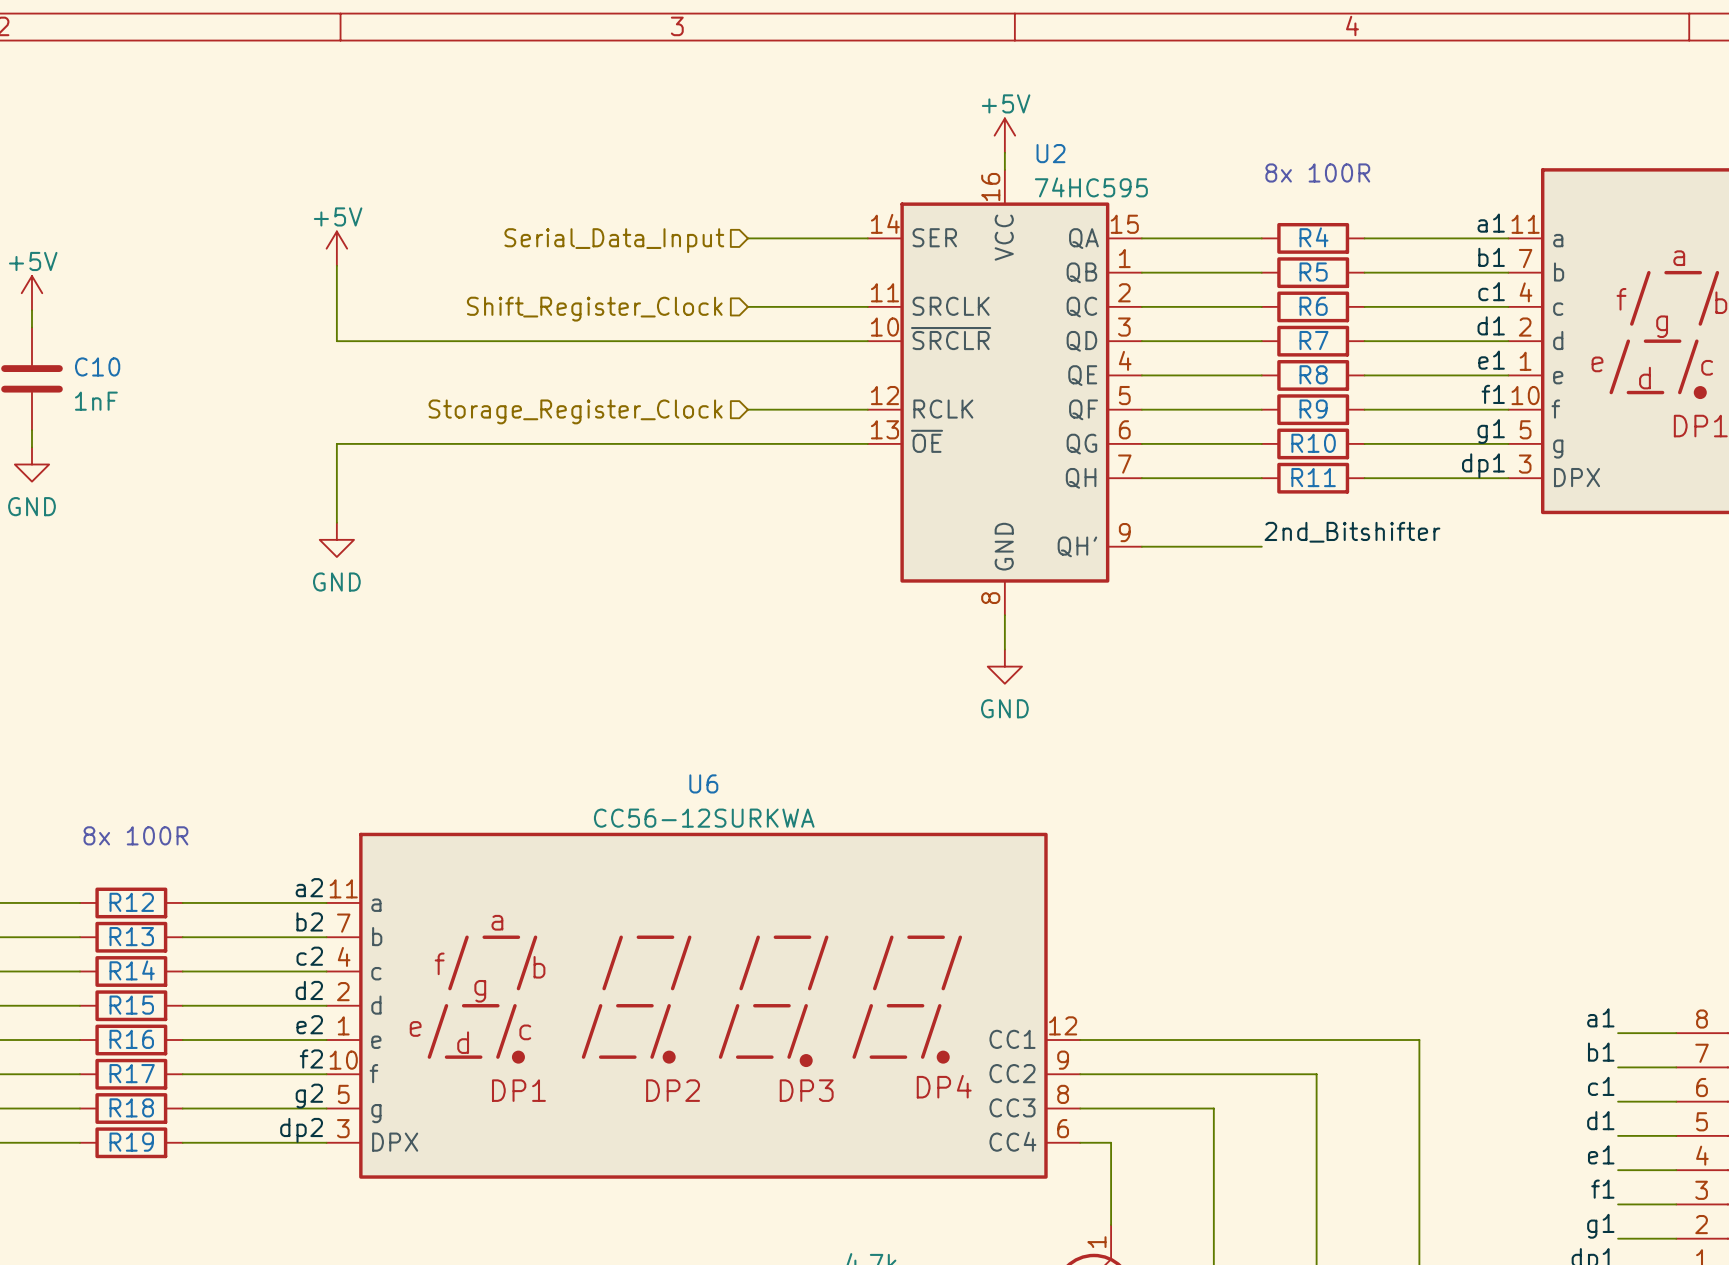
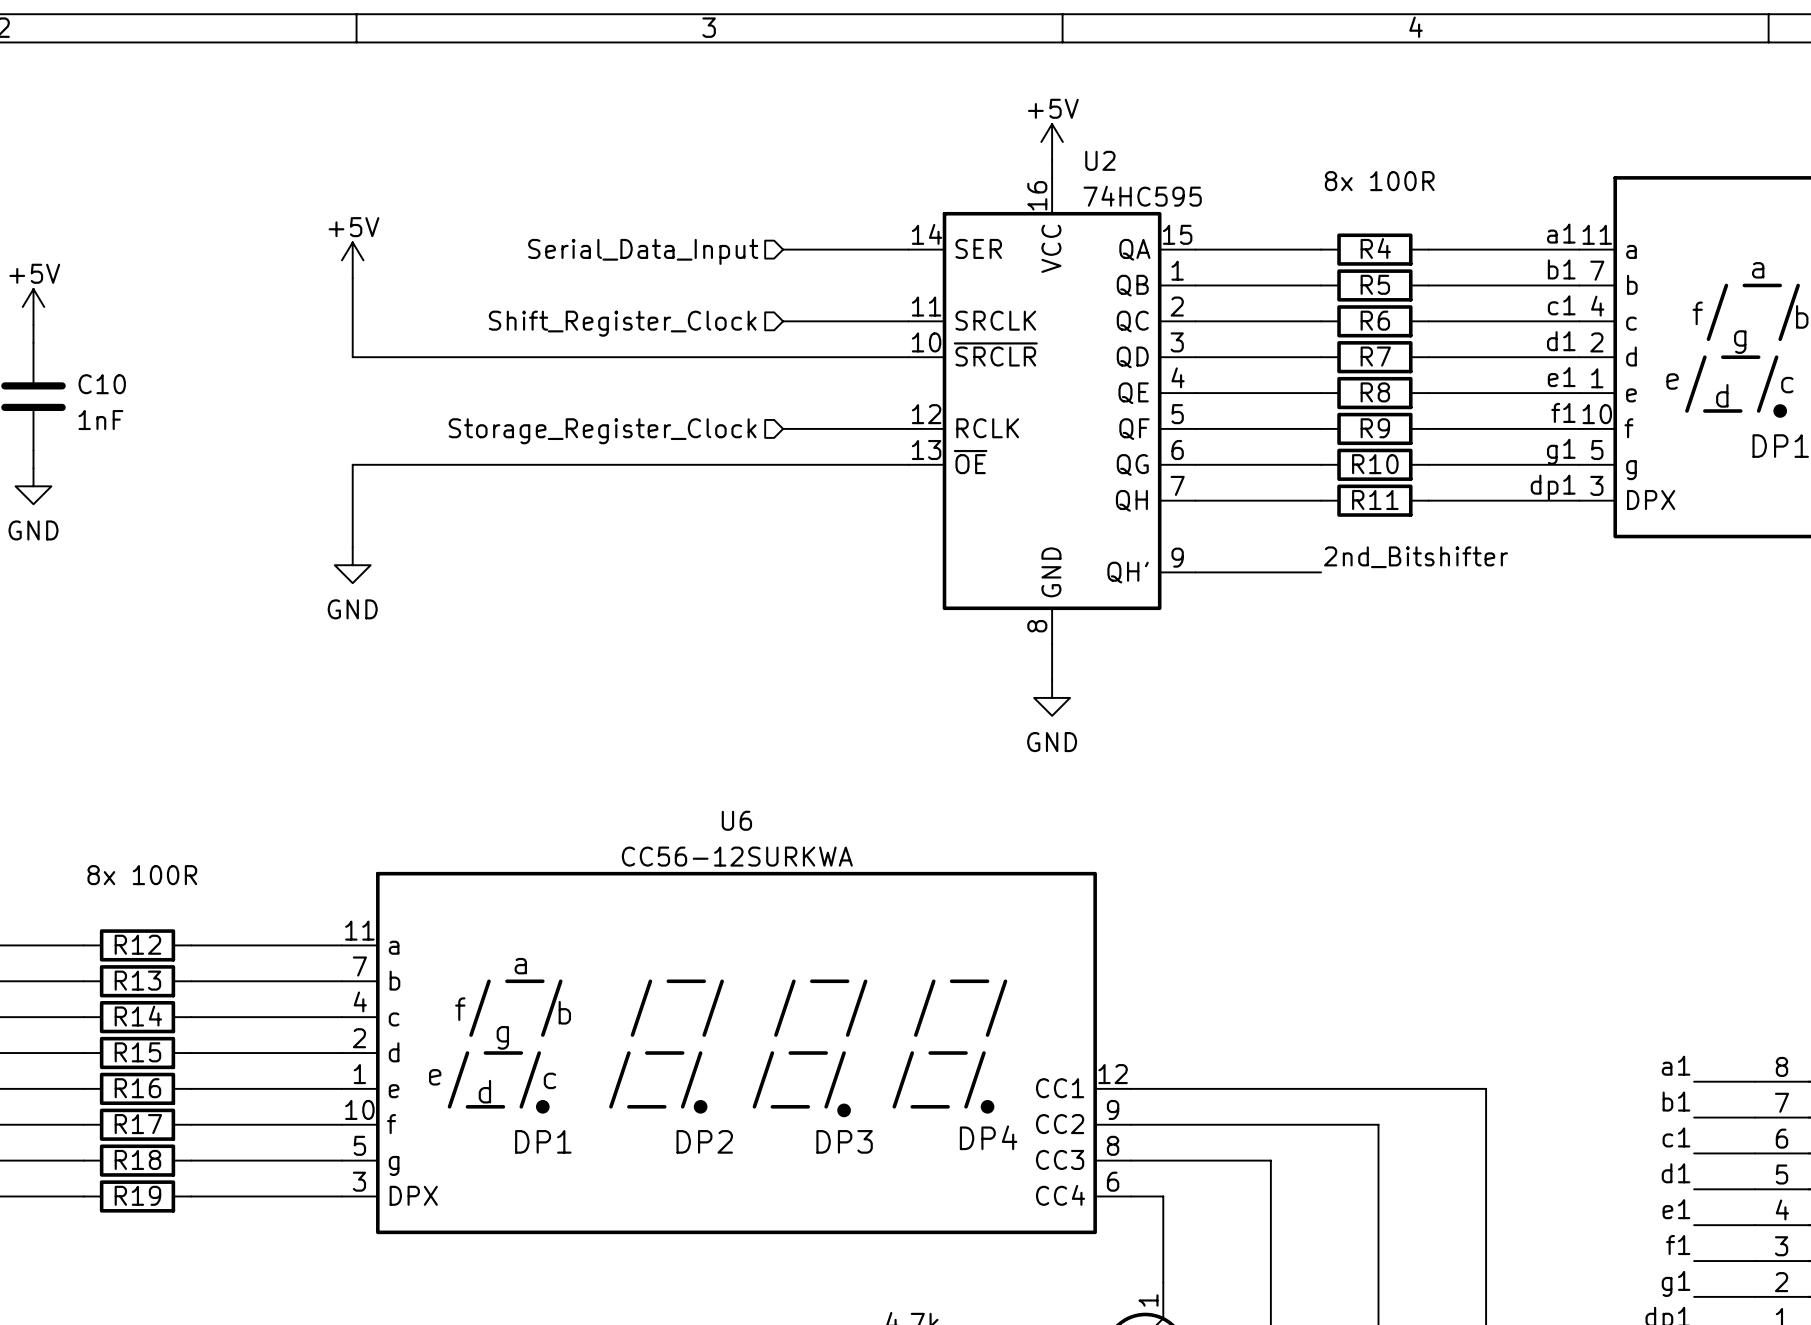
label: a2 (309, 887) -> none
label: b2 (309, 921) -> none
label: c2 (309, 956) -> none
label: d2 (309, 990) -> none
label: e2 (309, 1024) -> none
label: f2 (311, 1058) -> none
label: g2 (309, 1096) -> none
label: dp2 (301, 1130) -> none

